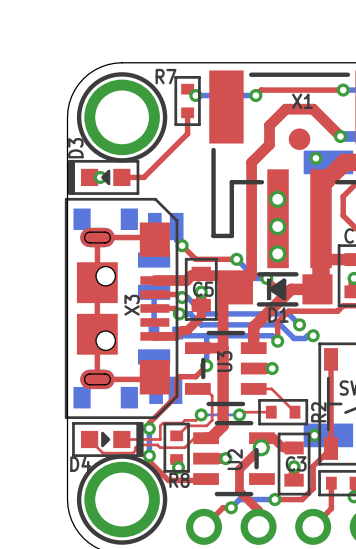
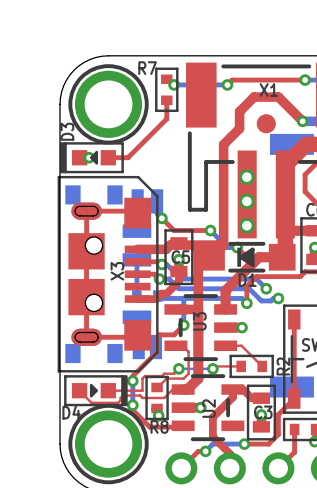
via: (315, 158) -> none
via: (314, 435) -> none
via: (261, 447) -> none

